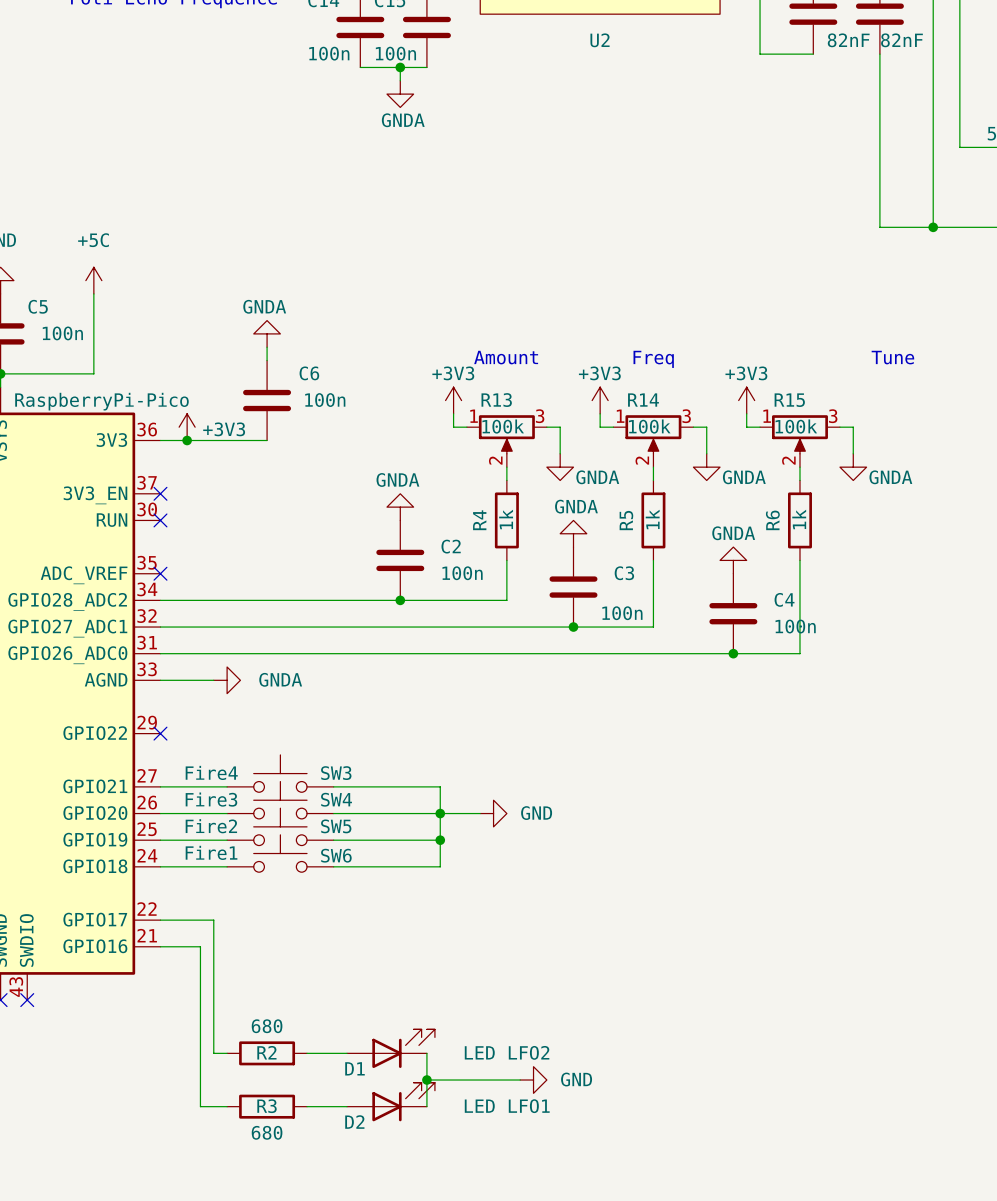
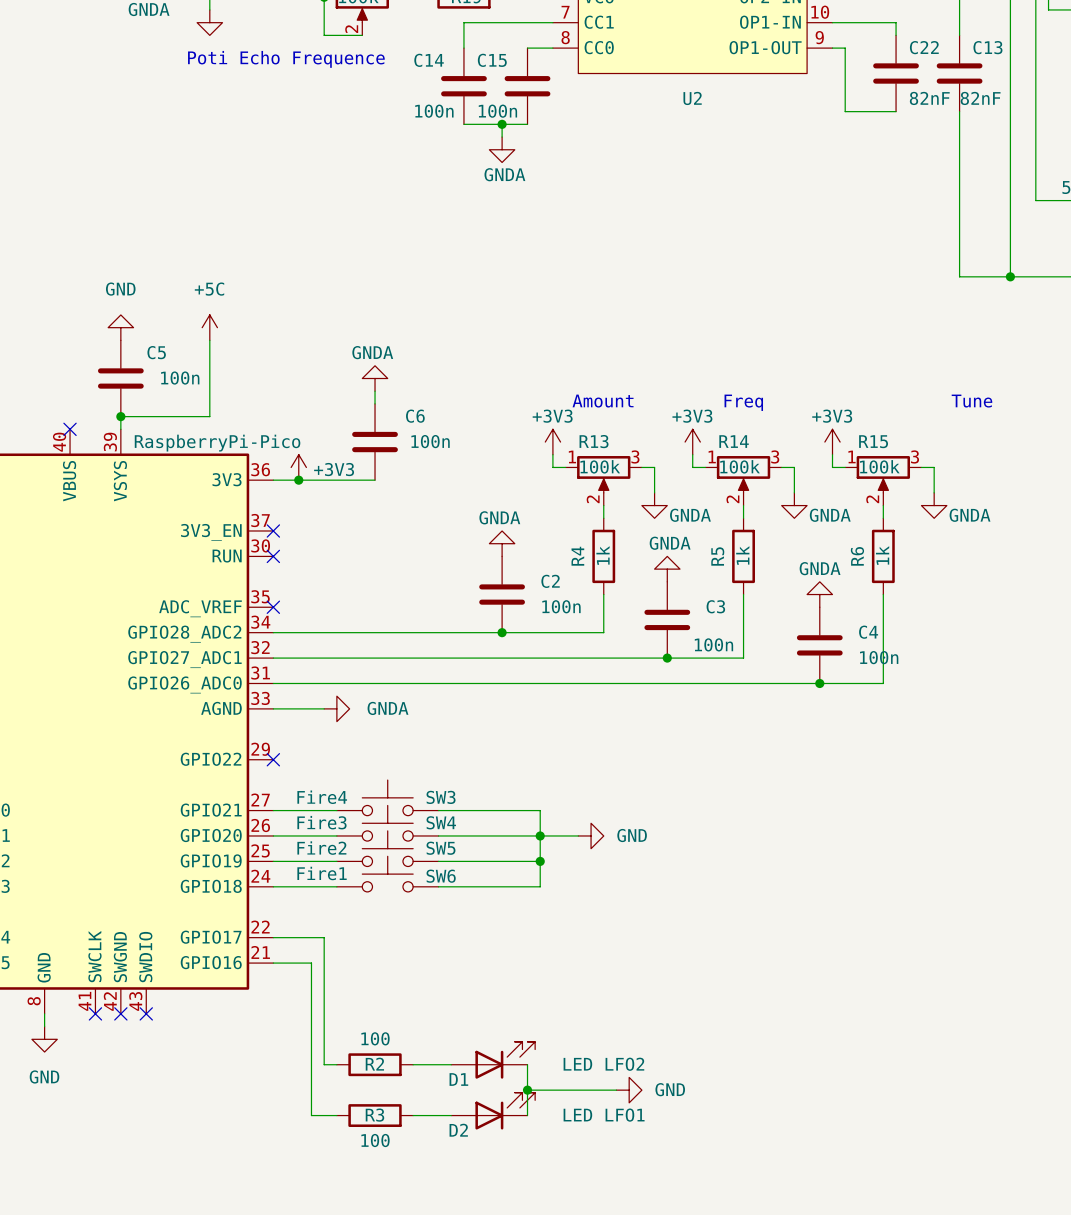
R2 value: 680 (267, 1026) -> 100 (375, 1038)
R3 value: 680 (267, 1132) -> 100 (375, 1140)

